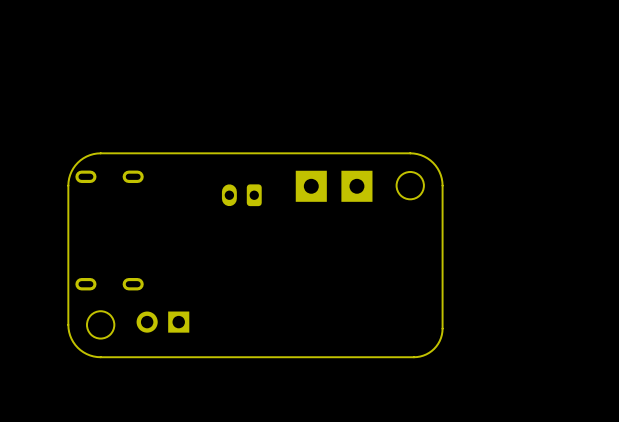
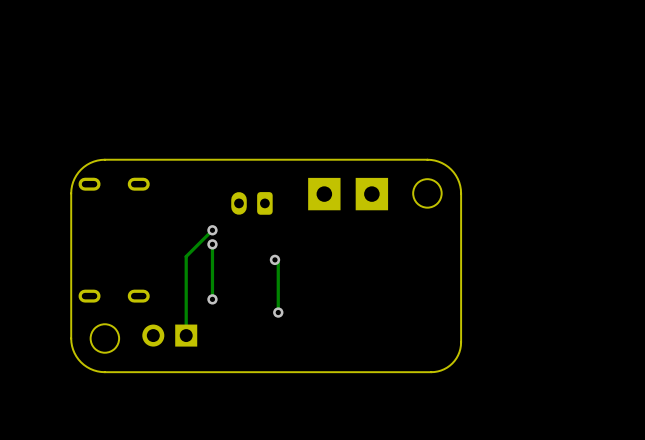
track: none -> (212, 230) (186, 256) (186, 335)
via: none -> (212, 230)
track: none -> (212, 244) (212, 299)
via: none -> (212, 244)
track: none -> (274, 259) (278, 263) (278, 312)
via: none -> (274, 259)
via: none -> (212, 299)
via: none -> (278, 312)

